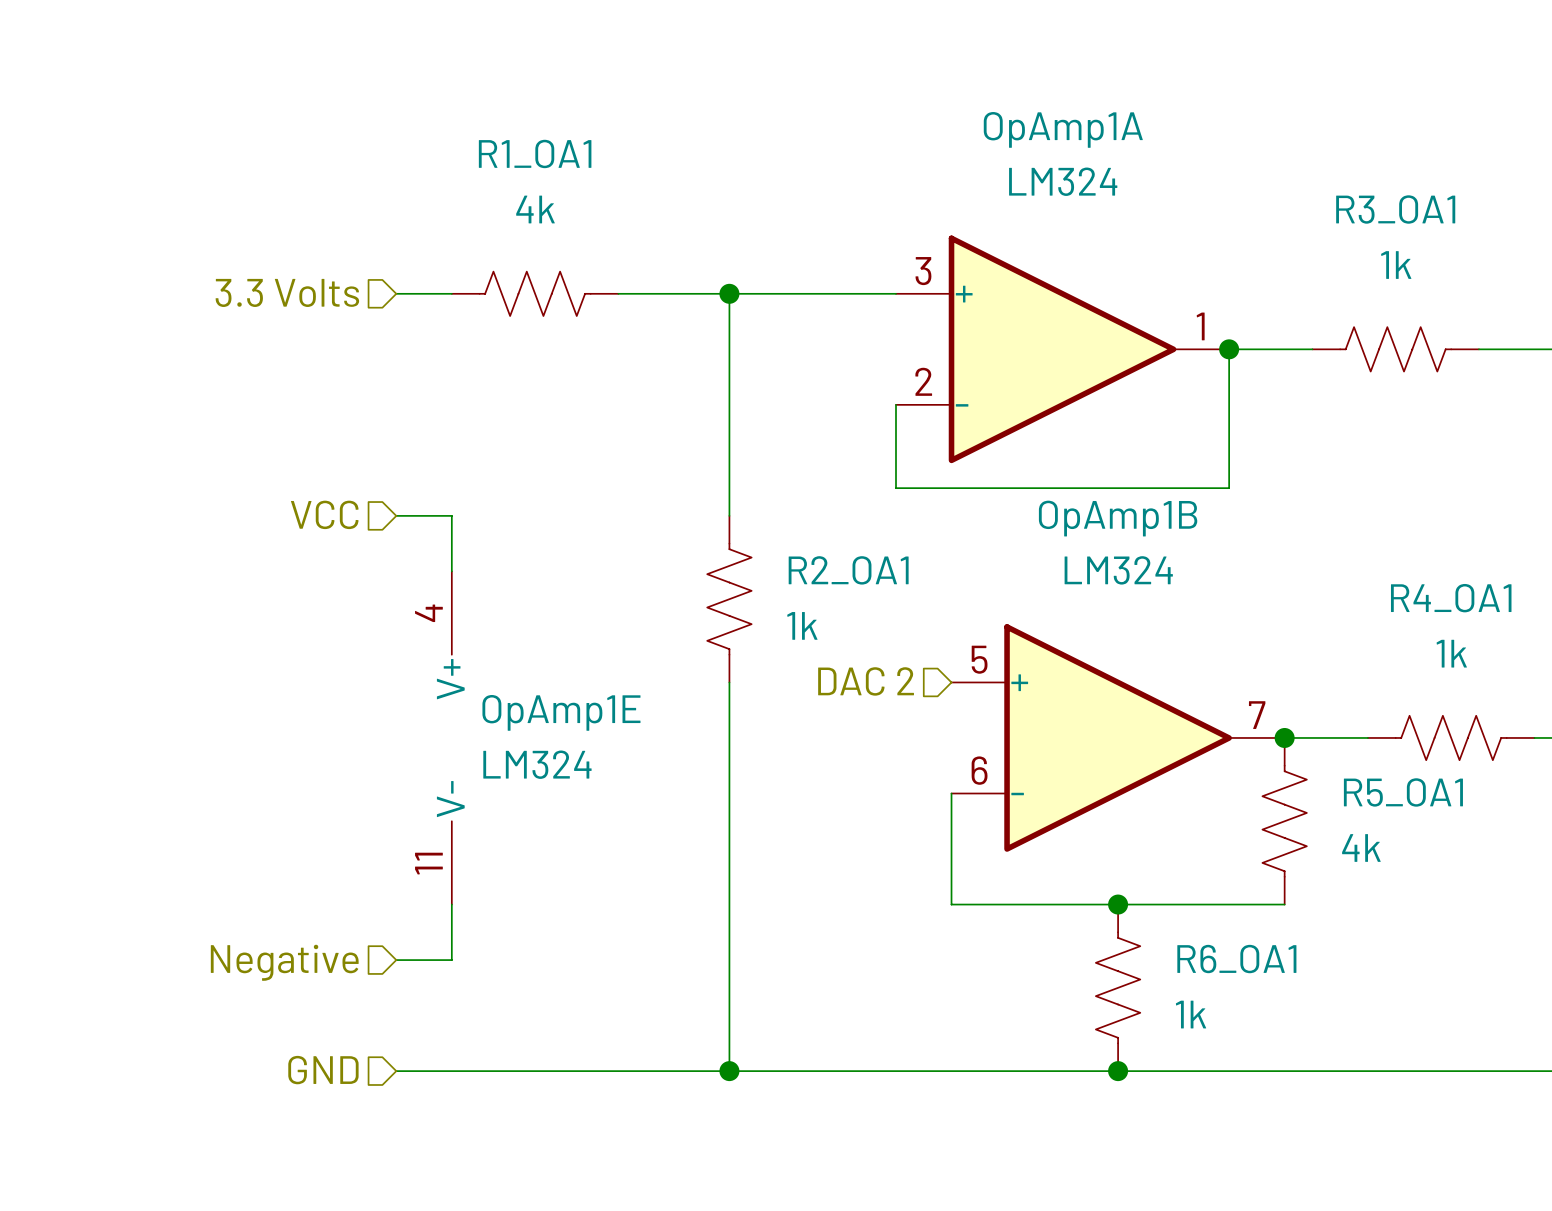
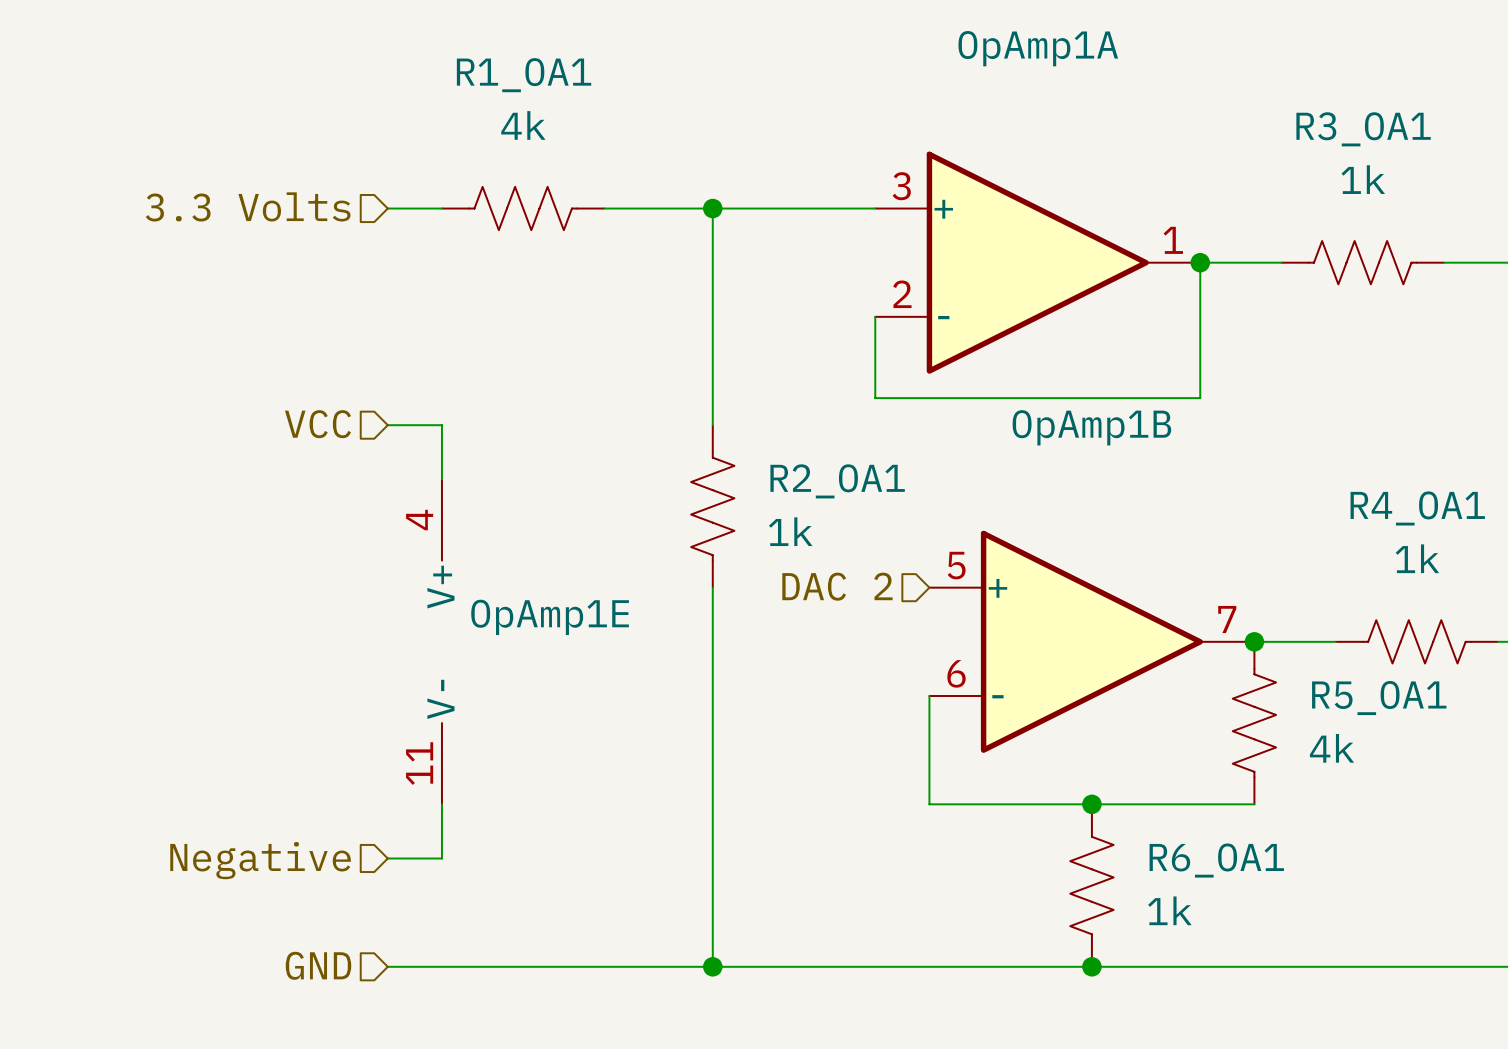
OpAmp1A value: LM324 (1063, 181) -> none
OpAmp1B value: LM324 (1118, 570) -> none
OpAmp1E value: LM324 (537, 764) -> none

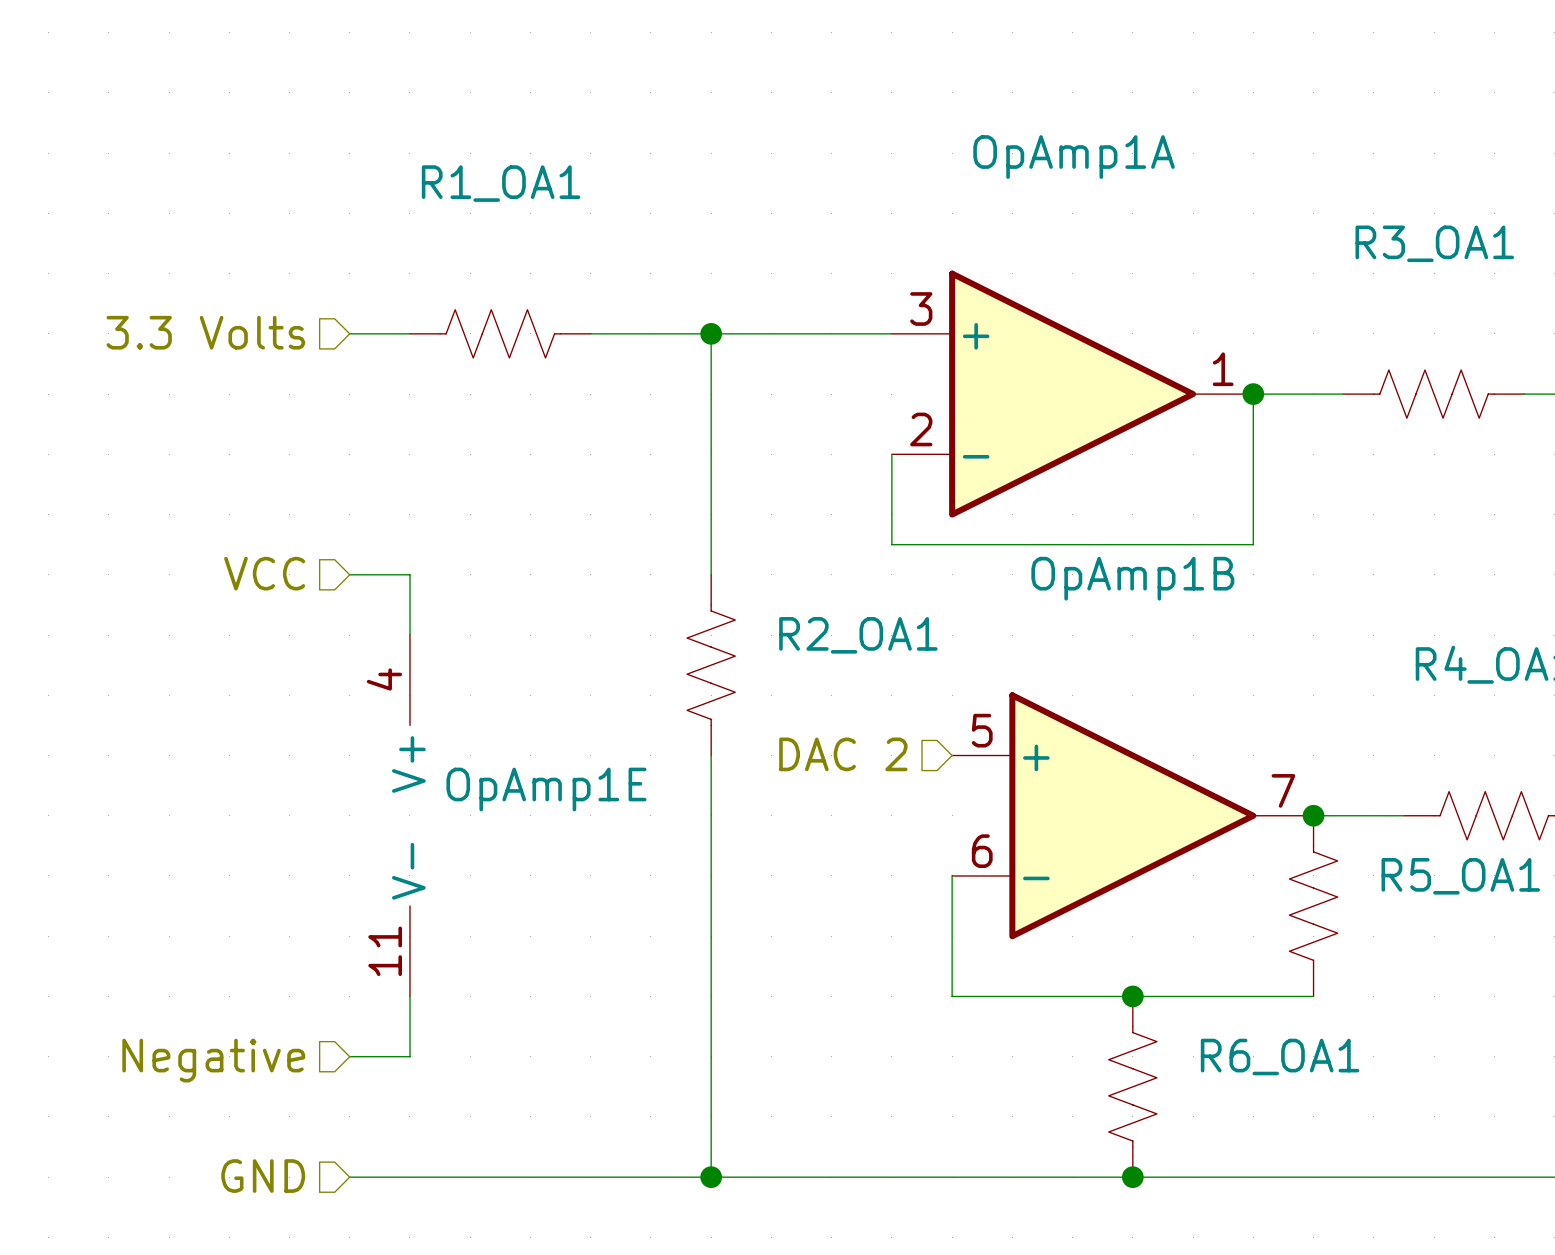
R1_OA1 value: 4k (523, 125) -> none
R3_OA1 value: 1k (1363, 179) -> none
R2_OA1 value: 1k (790, 531) -> none
R4_OA1 value: 1k (1417, 558) -> none
R5_OA1 value: 4k (1332, 748) -> none
R6_OA1 value: 1k (1169, 910) -> none

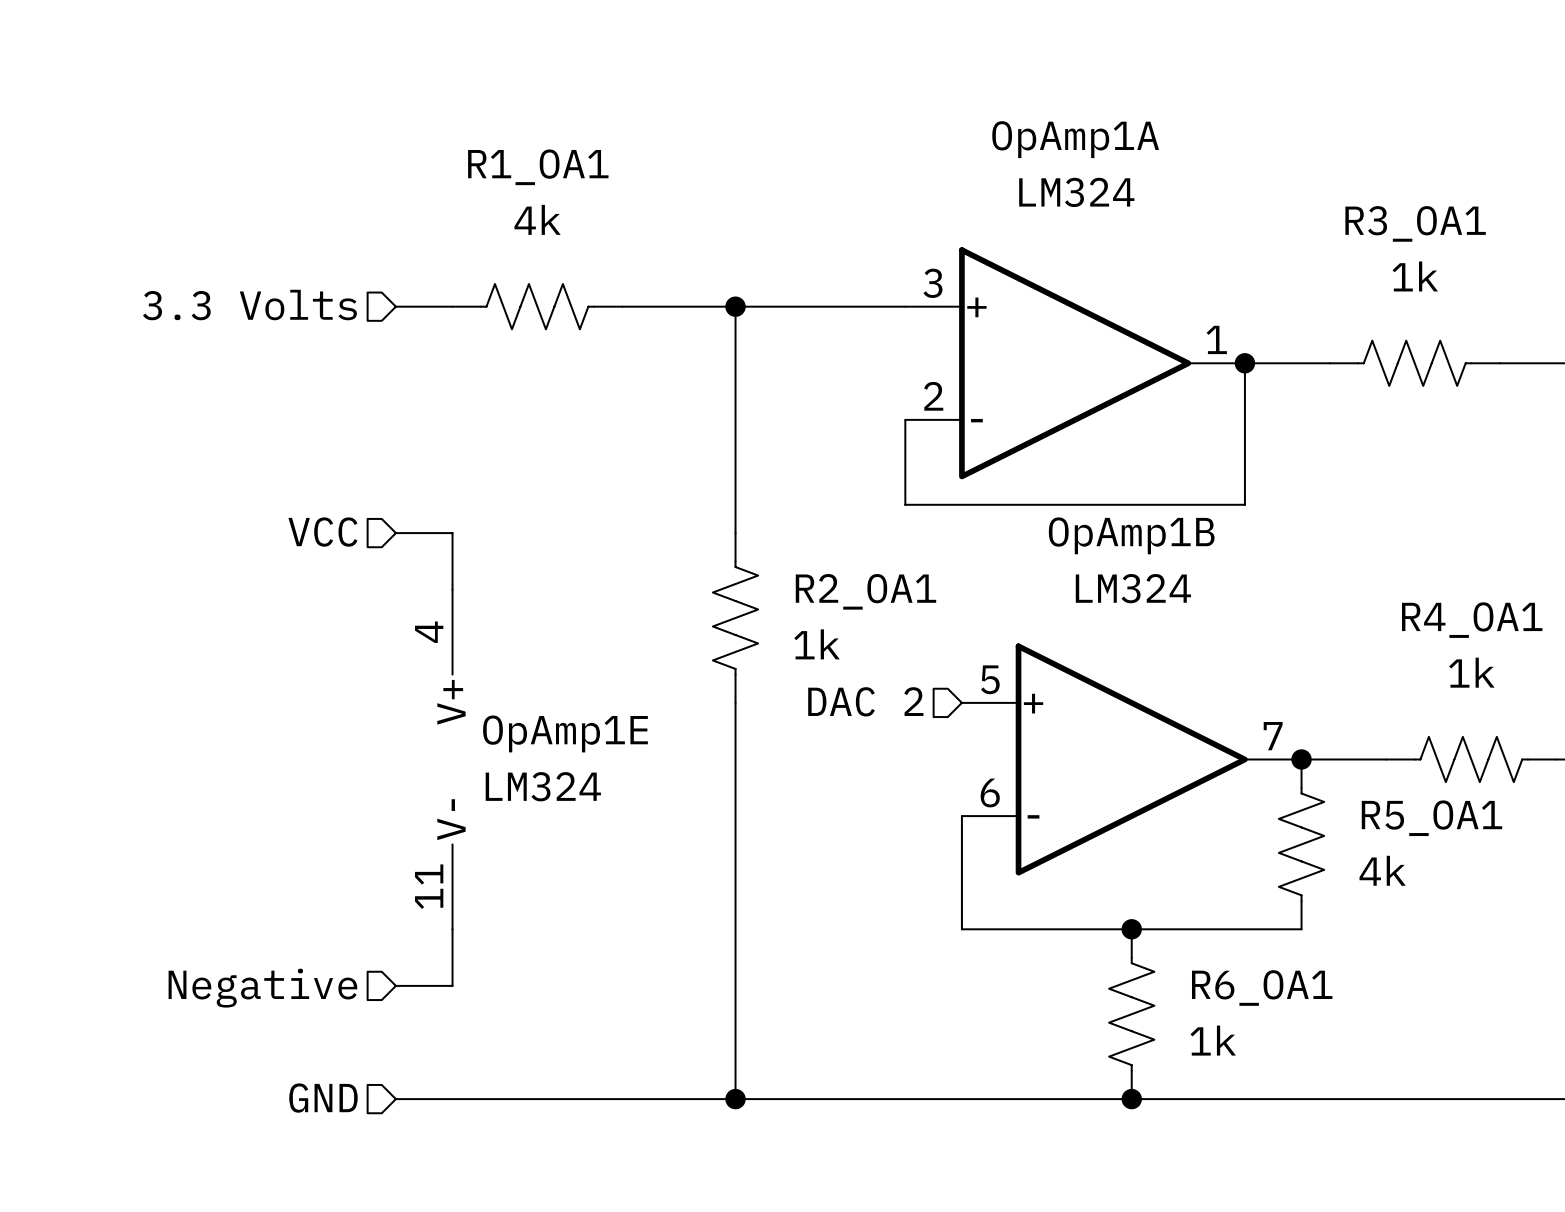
OpAmp1A value: none -> LM324 (1076, 192)
R1_OA1 value: none -> 4k (537, 219)
R3_OA1 value: none -> 1k (1415, 276)
OpAmp1B value: none -> LM324 (1133, 588)
R2_OA1 value: none -> 1k (817, 644)
R4_OA1 value: none -> 1k (1471, 672)
OpAmp1E value: none -> LM324 (543, 786)
R5_OA1 value: none -> 4k (1382, 870)
R6_OA1 value: none -> 1k (1213, 1040)

